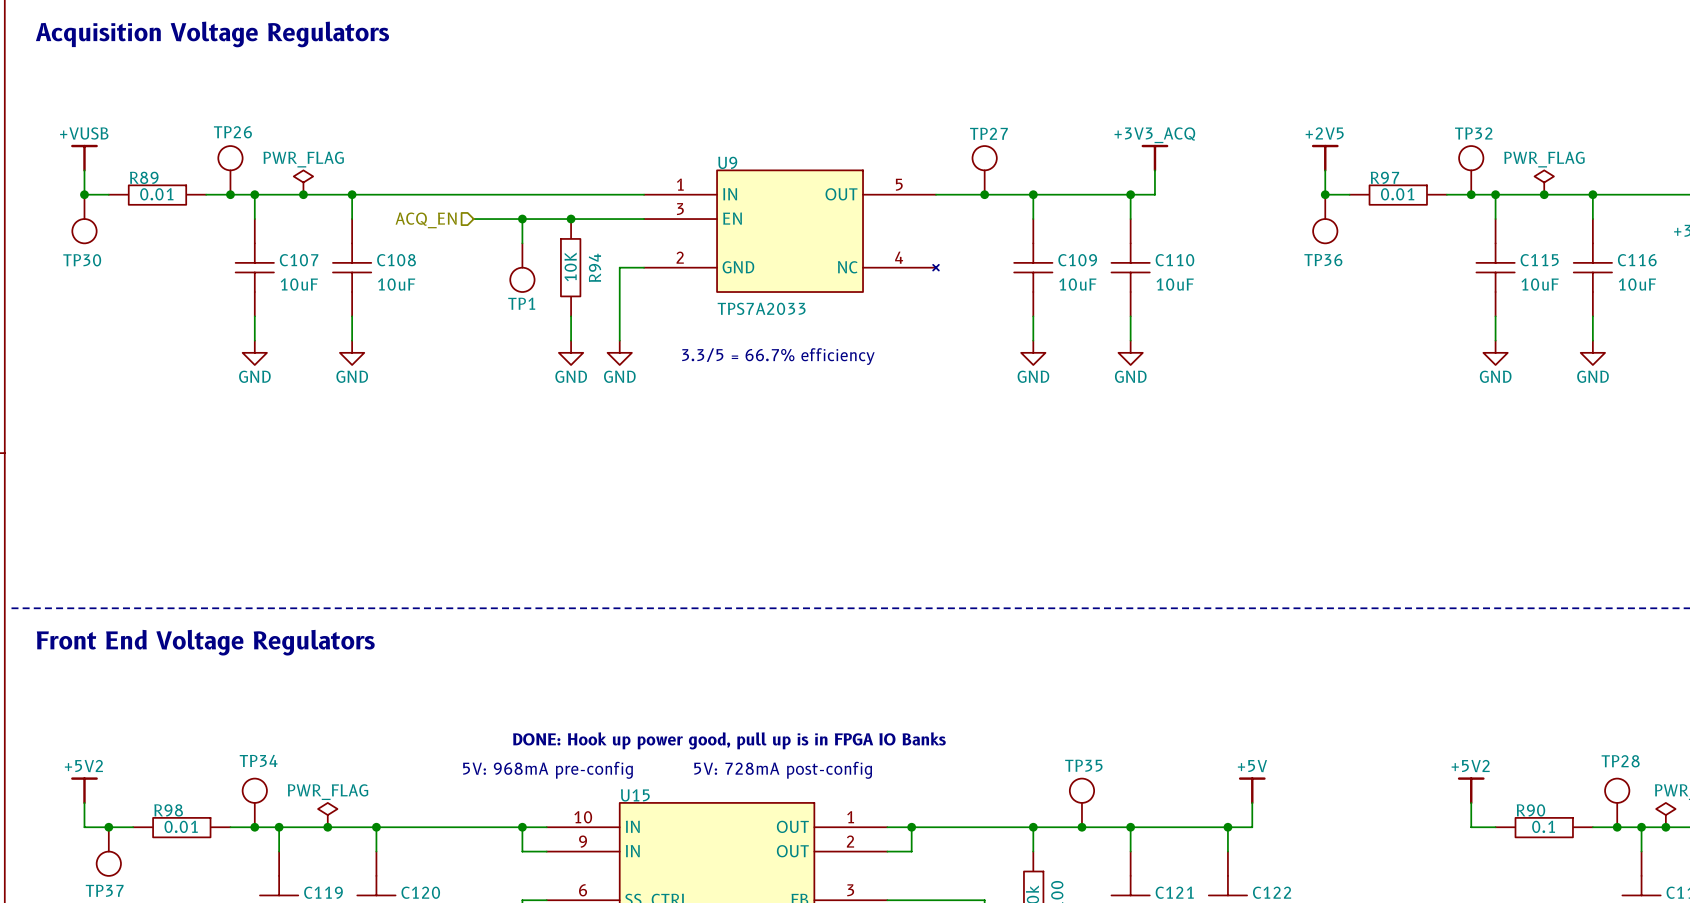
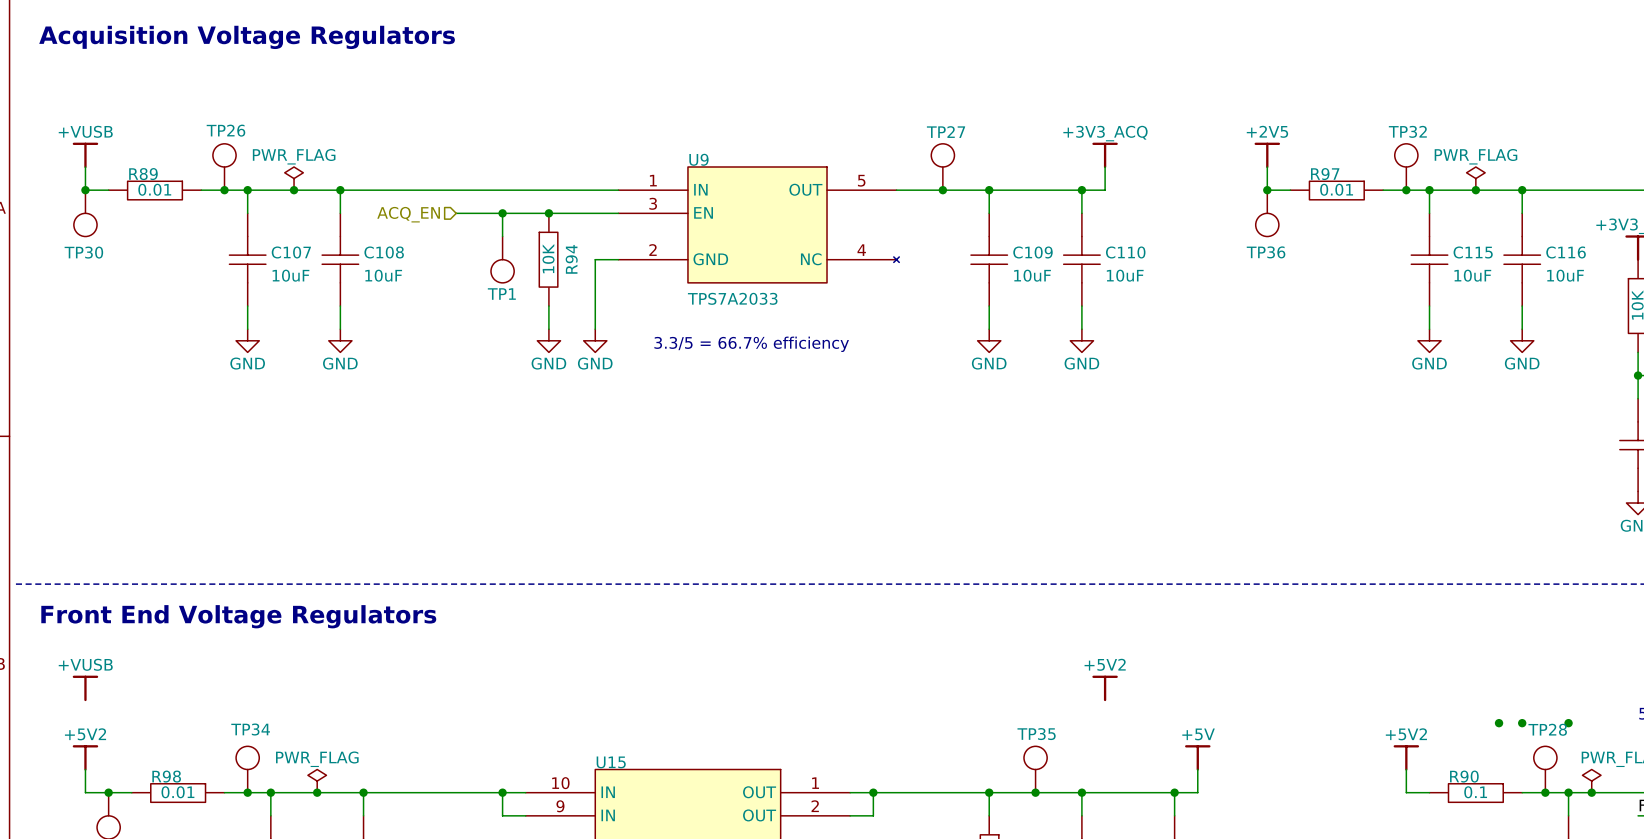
power symbol: none -> +VUSB (85, 688)
power symbol: none -> +5V2 (1105, 688)
text: DONE: Hook up power good, pull up is in FPGA IO Banks (729, 740) -> none
junction: none -> (1499, 723)
junction: none -> (1522, 723)
junction: none -> (1568, 723)
text: 5V: 968mA pre-config (548, 770) -> none
text: 5V: 728mA post-config (783, 770) -> none

